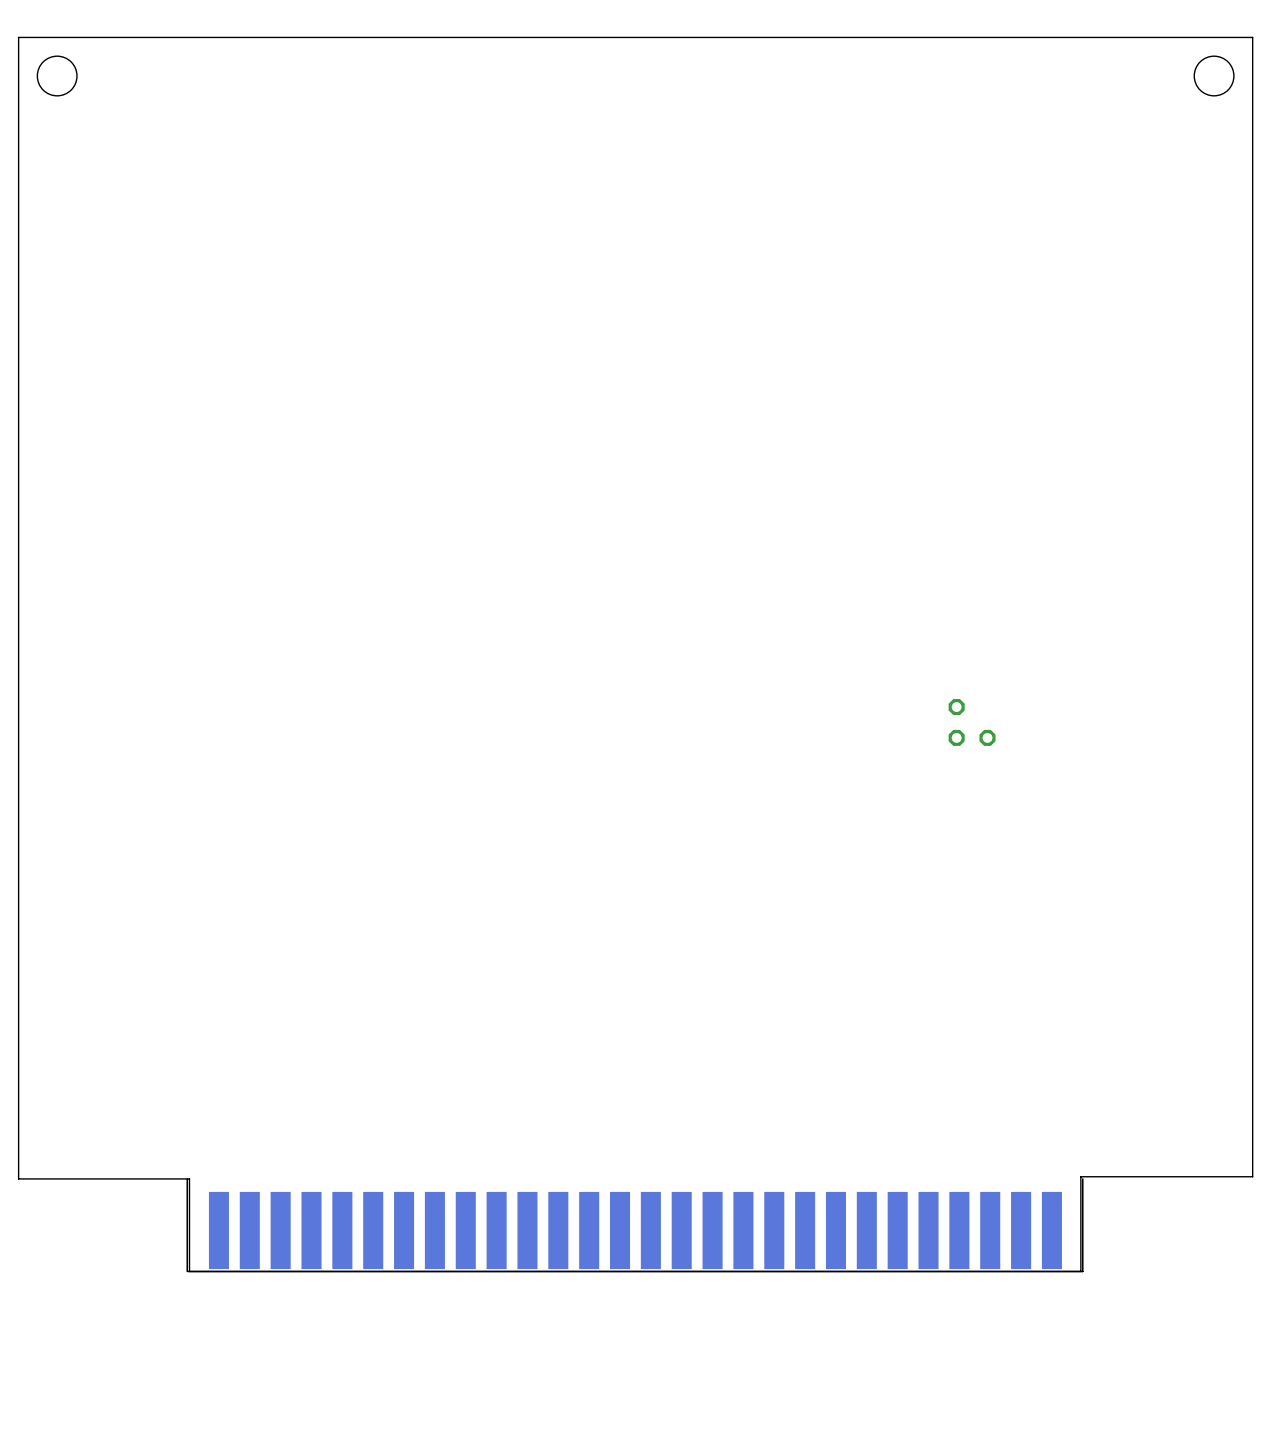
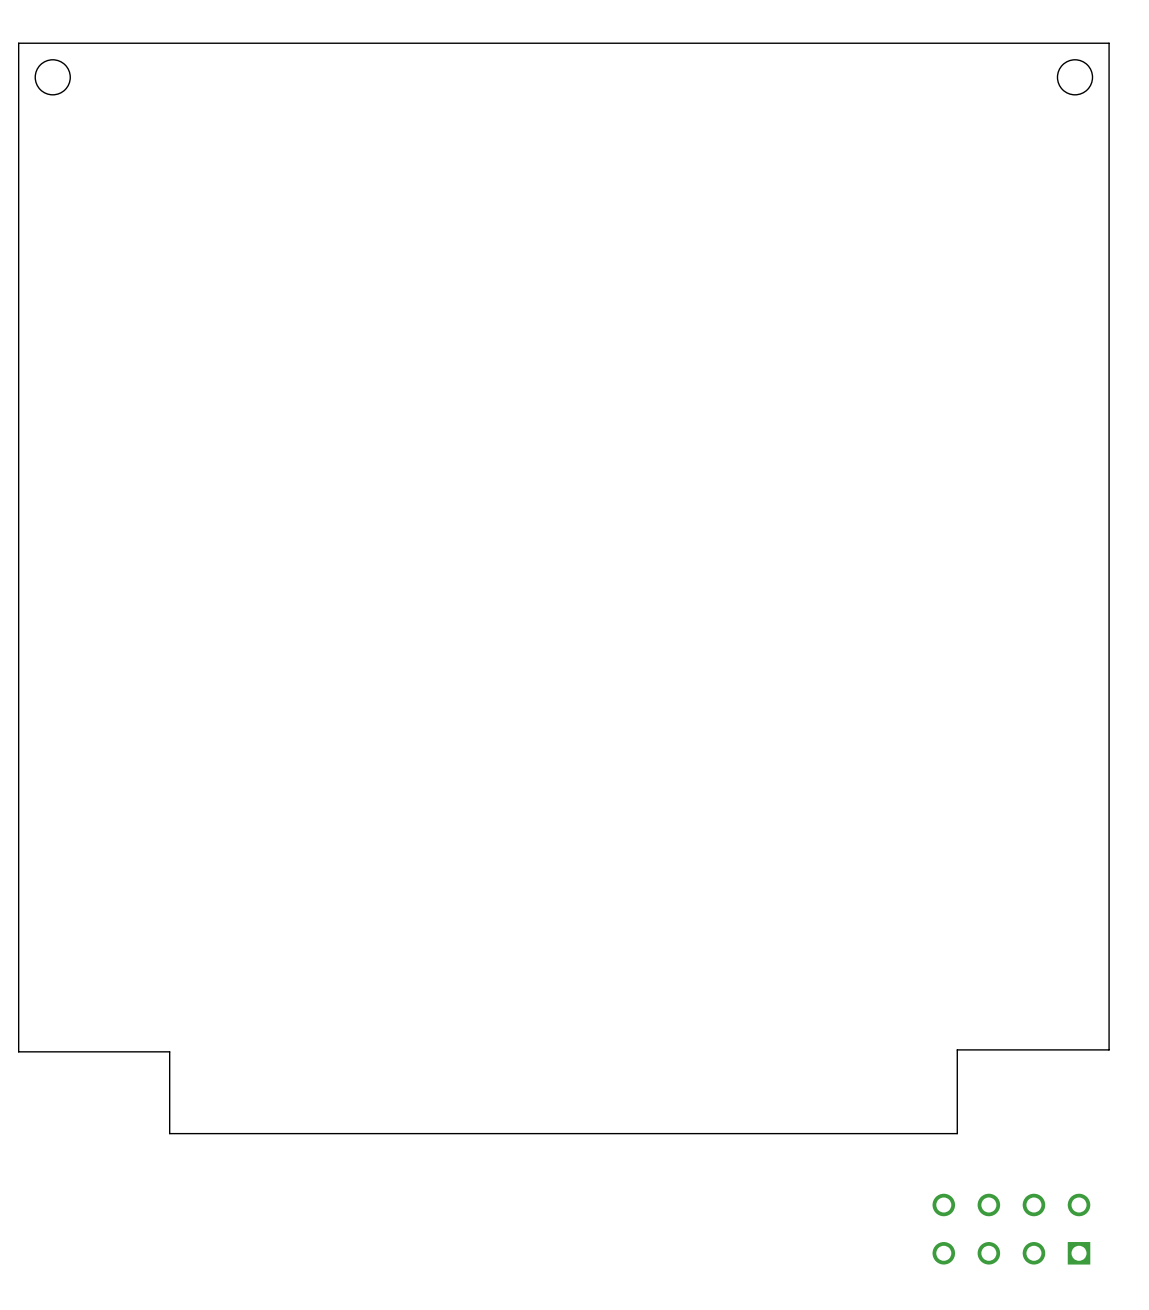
part: (972, 722) -> none
part: (635, 1225) -> none
part: none -> (1011, 1229)

